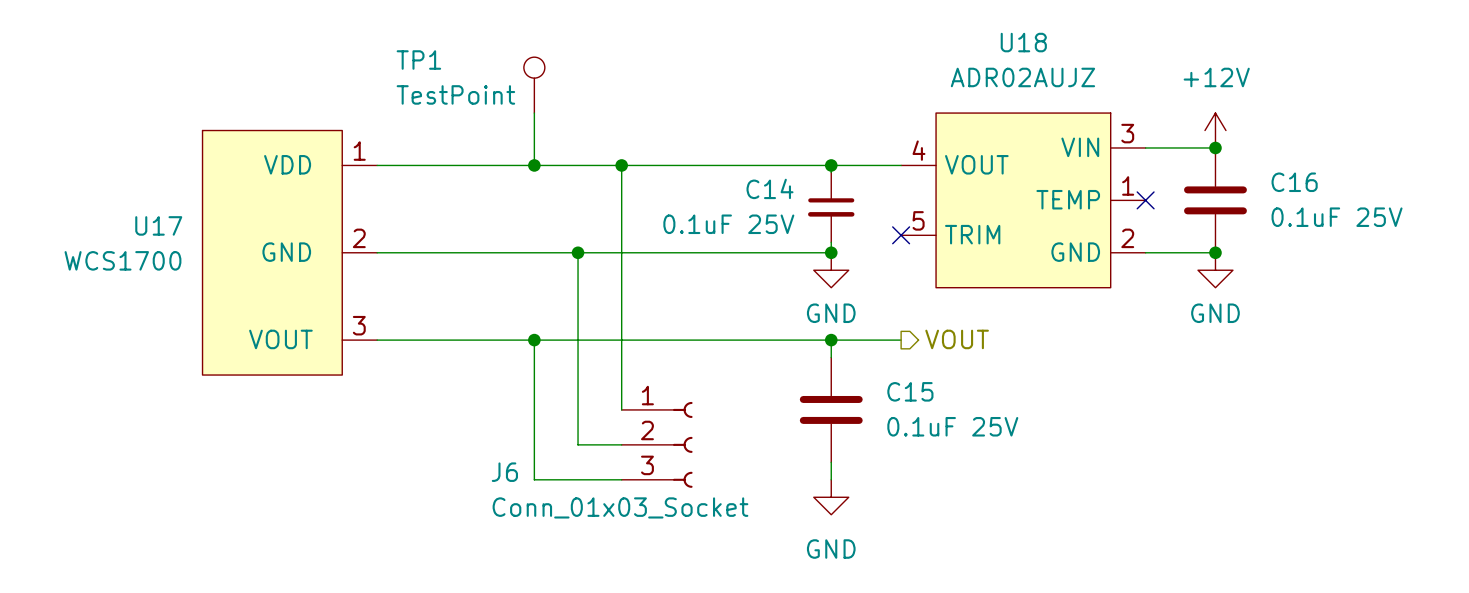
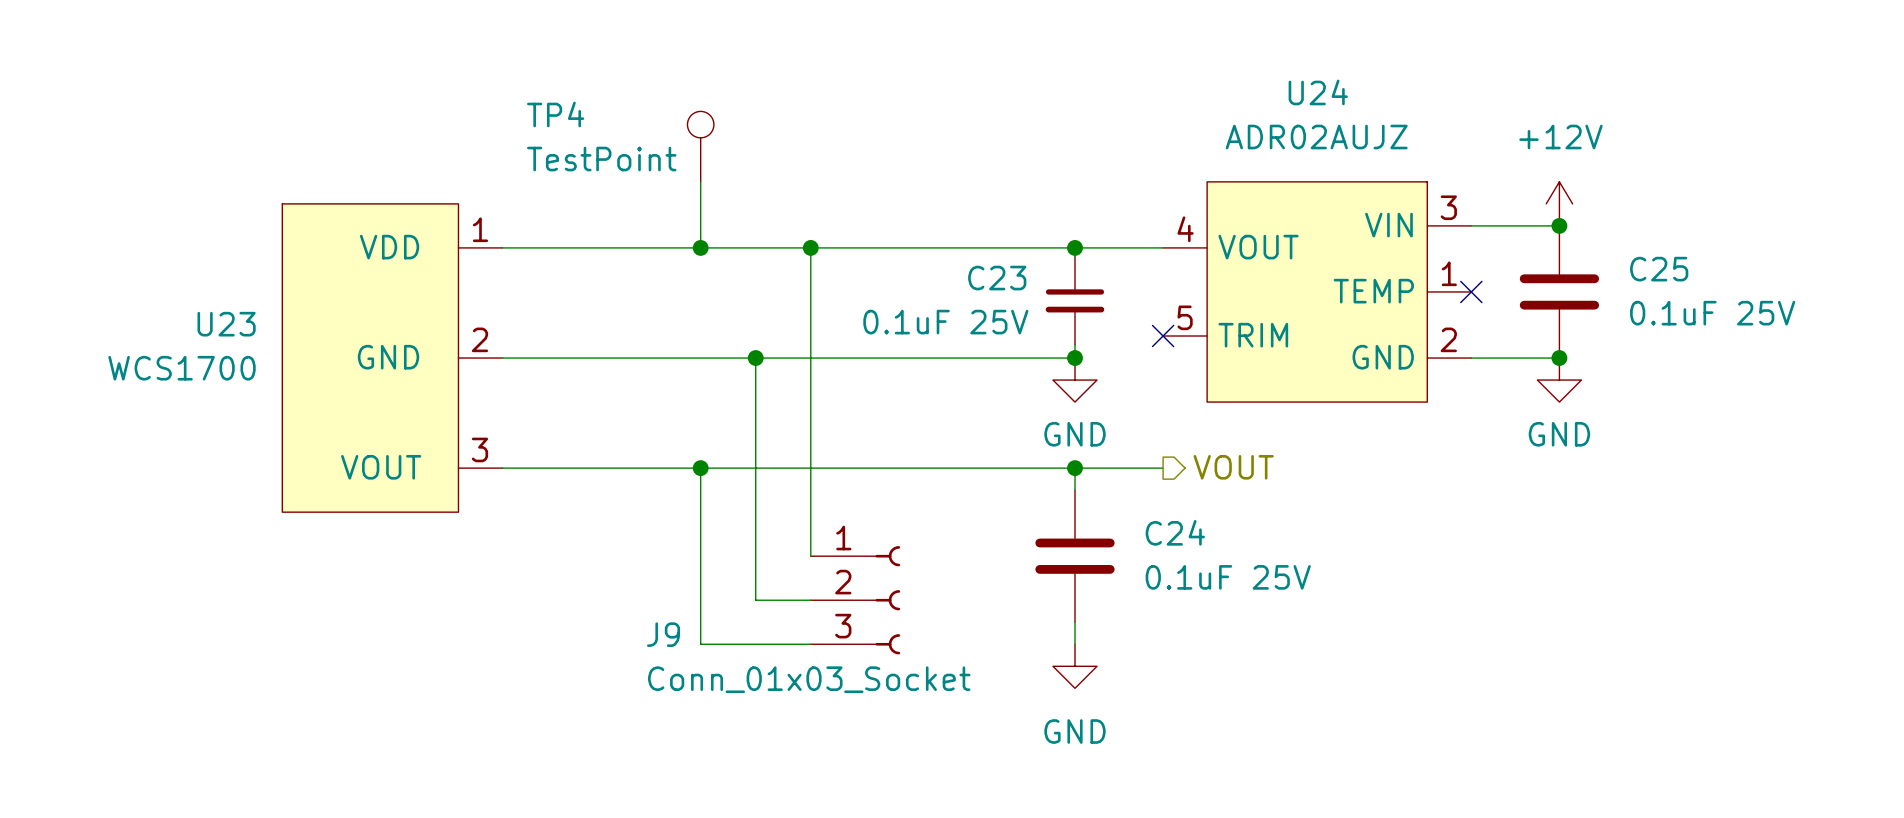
U18 name: U18 (1023, 42) -> U24 (1318, 92)
TP1 name: TP1 (418, 60) -> TP4 (555, 114)
C16 name: C16 (1294, 182) -> C25 (1659, 269)
C14 name: C14 (770, 188) -> C23 (997, 278)
U17 name: U17 (158, 225) -> U23 (226, 324)
C15 name: C15 (910, 391) -> C24 (1175, 532)
J6 name: J6 (504, 472) -> J9 (663, 634)

